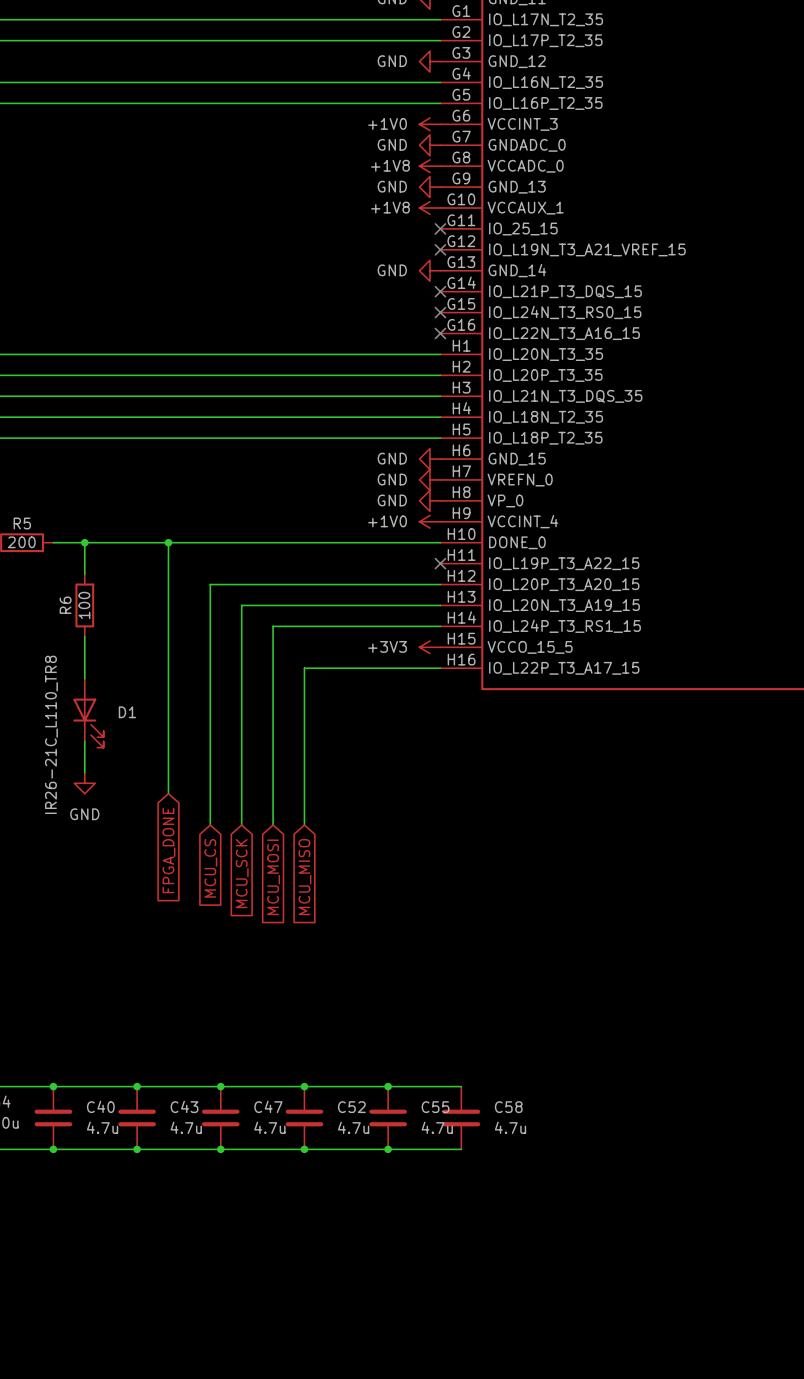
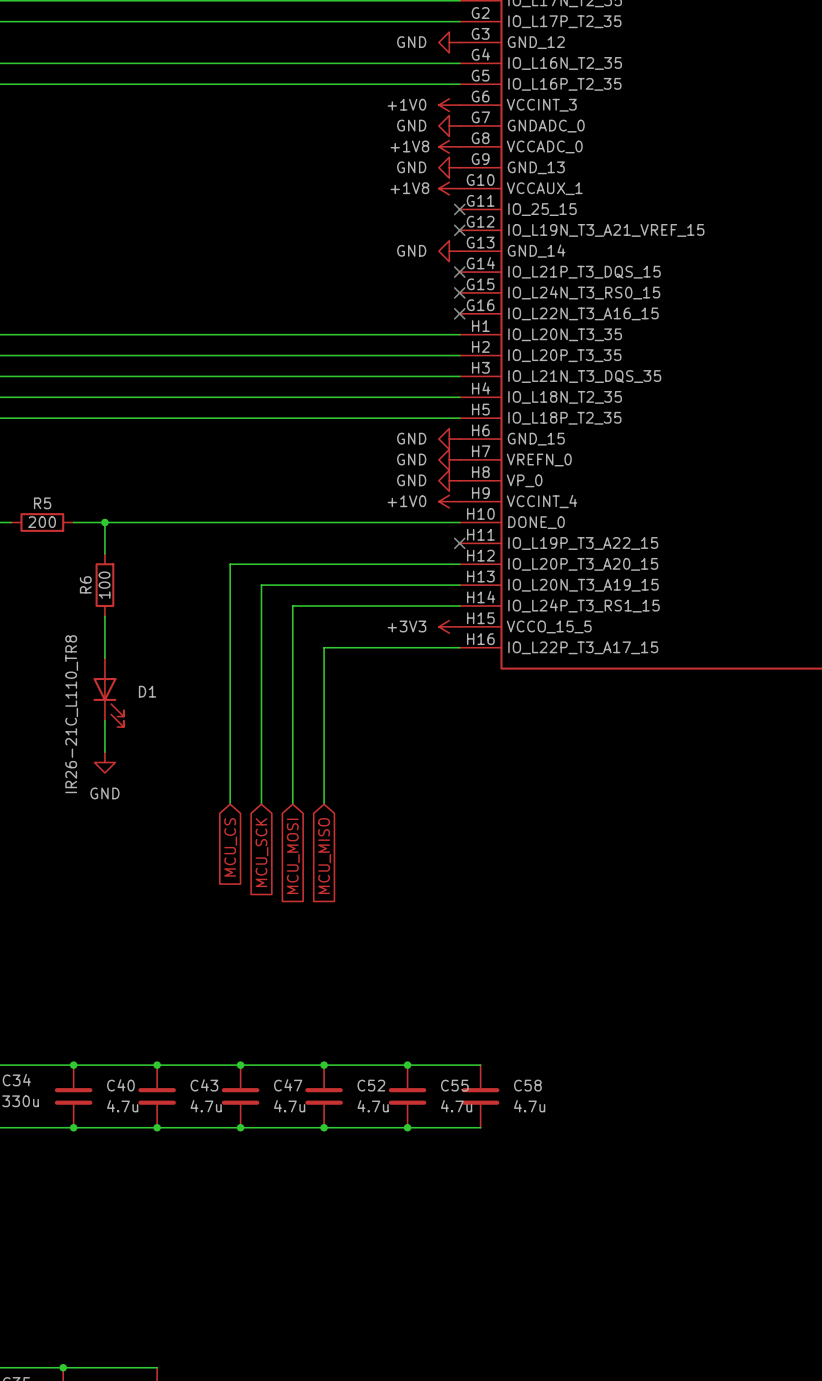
wire: (168, 542) (168, 793) -> none
junction: (168, 542) -> none
global label: FPGA_DONE (168, 850) -> none

